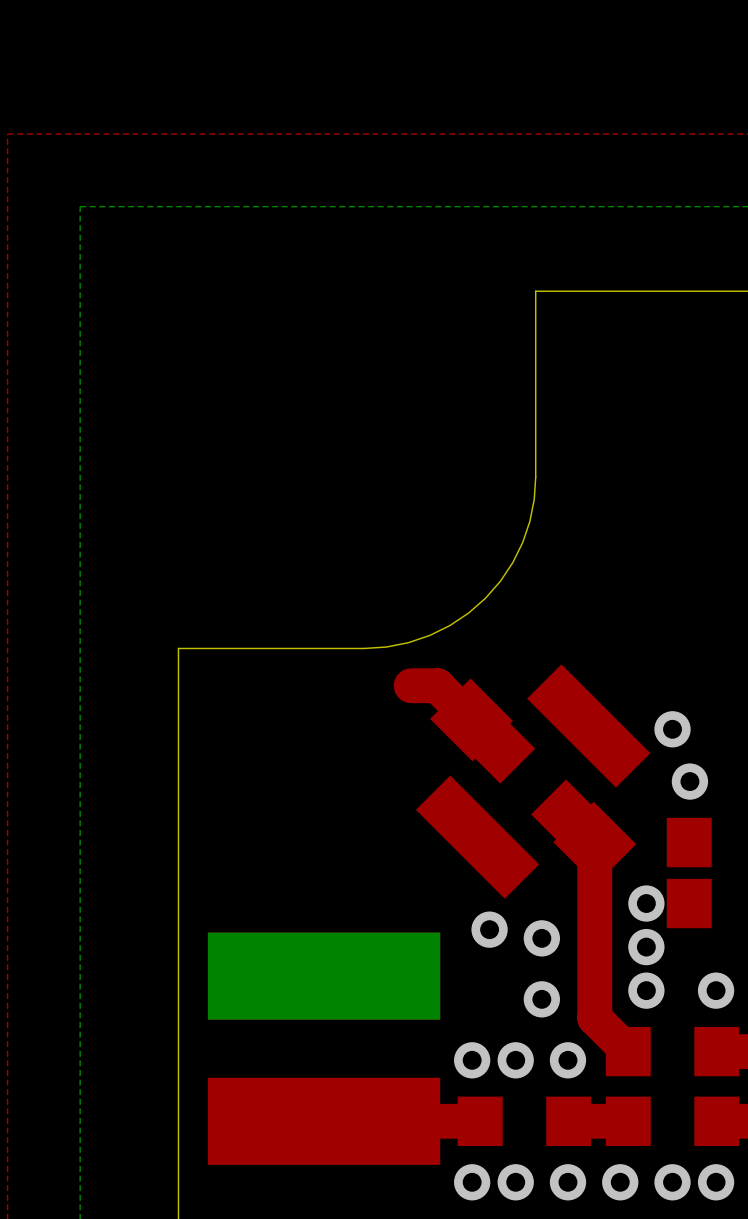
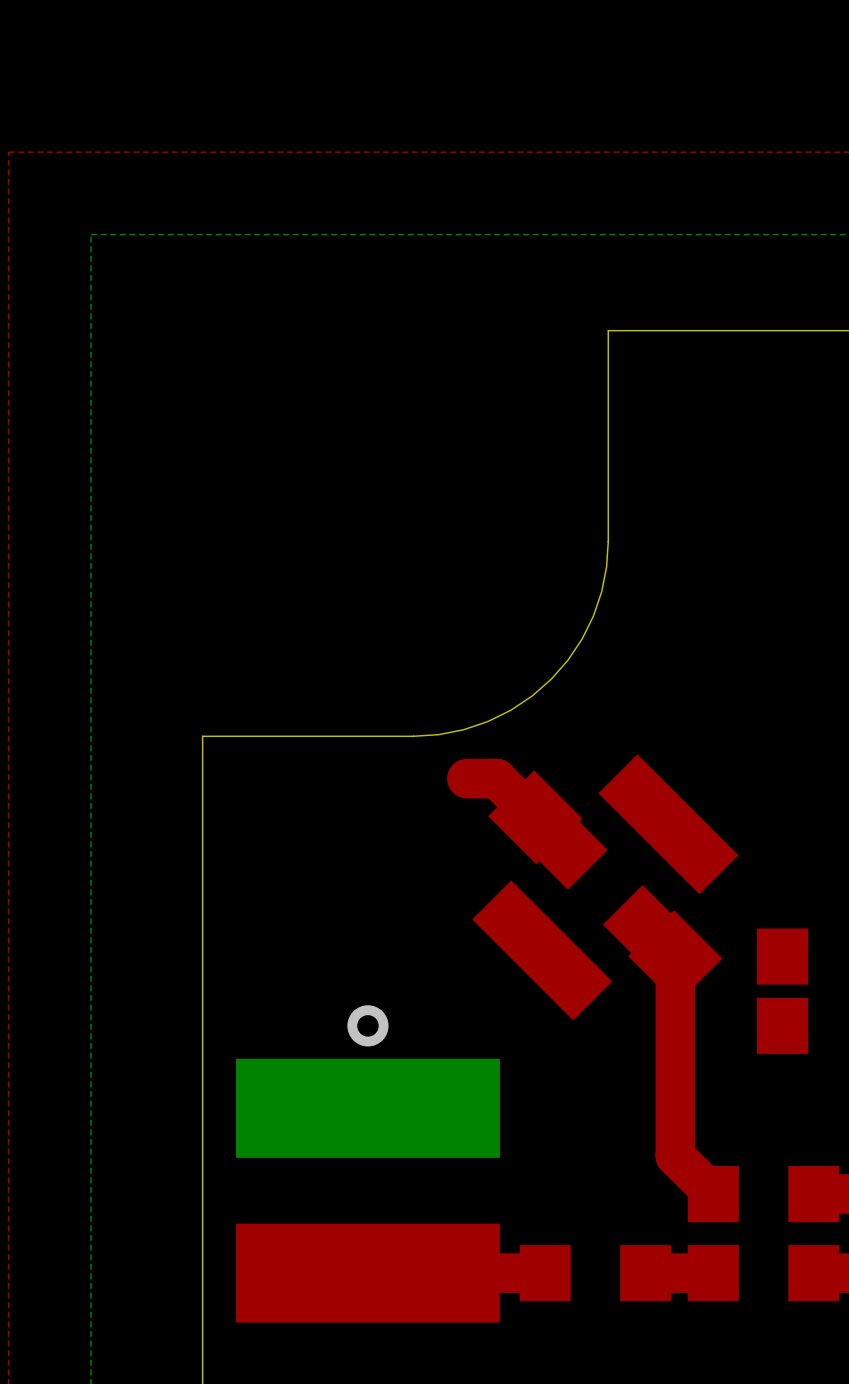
via: (672, 729) -> none
via: (689, 781) -> none
via: none -> (367, 1025)
via: (646, 903) -> none
via: (489, 929) -> none
via: (541, 938) -> none
via: (646, 947) -> none
via: (646, 990) -> none
via: (716, 990) -> none
via: (541, 999) -> none
via: (472, 1060) -> none
via: (515, 1060) -> none
via: (567, 1060) -> none
via: (472, 1182) -> none
via: (515, 1182) -> none
via: (567, 1182) -> none
via: (620, 1182) -> none
via: (672, 1182) -> none
via: (716, 1182) -> none

